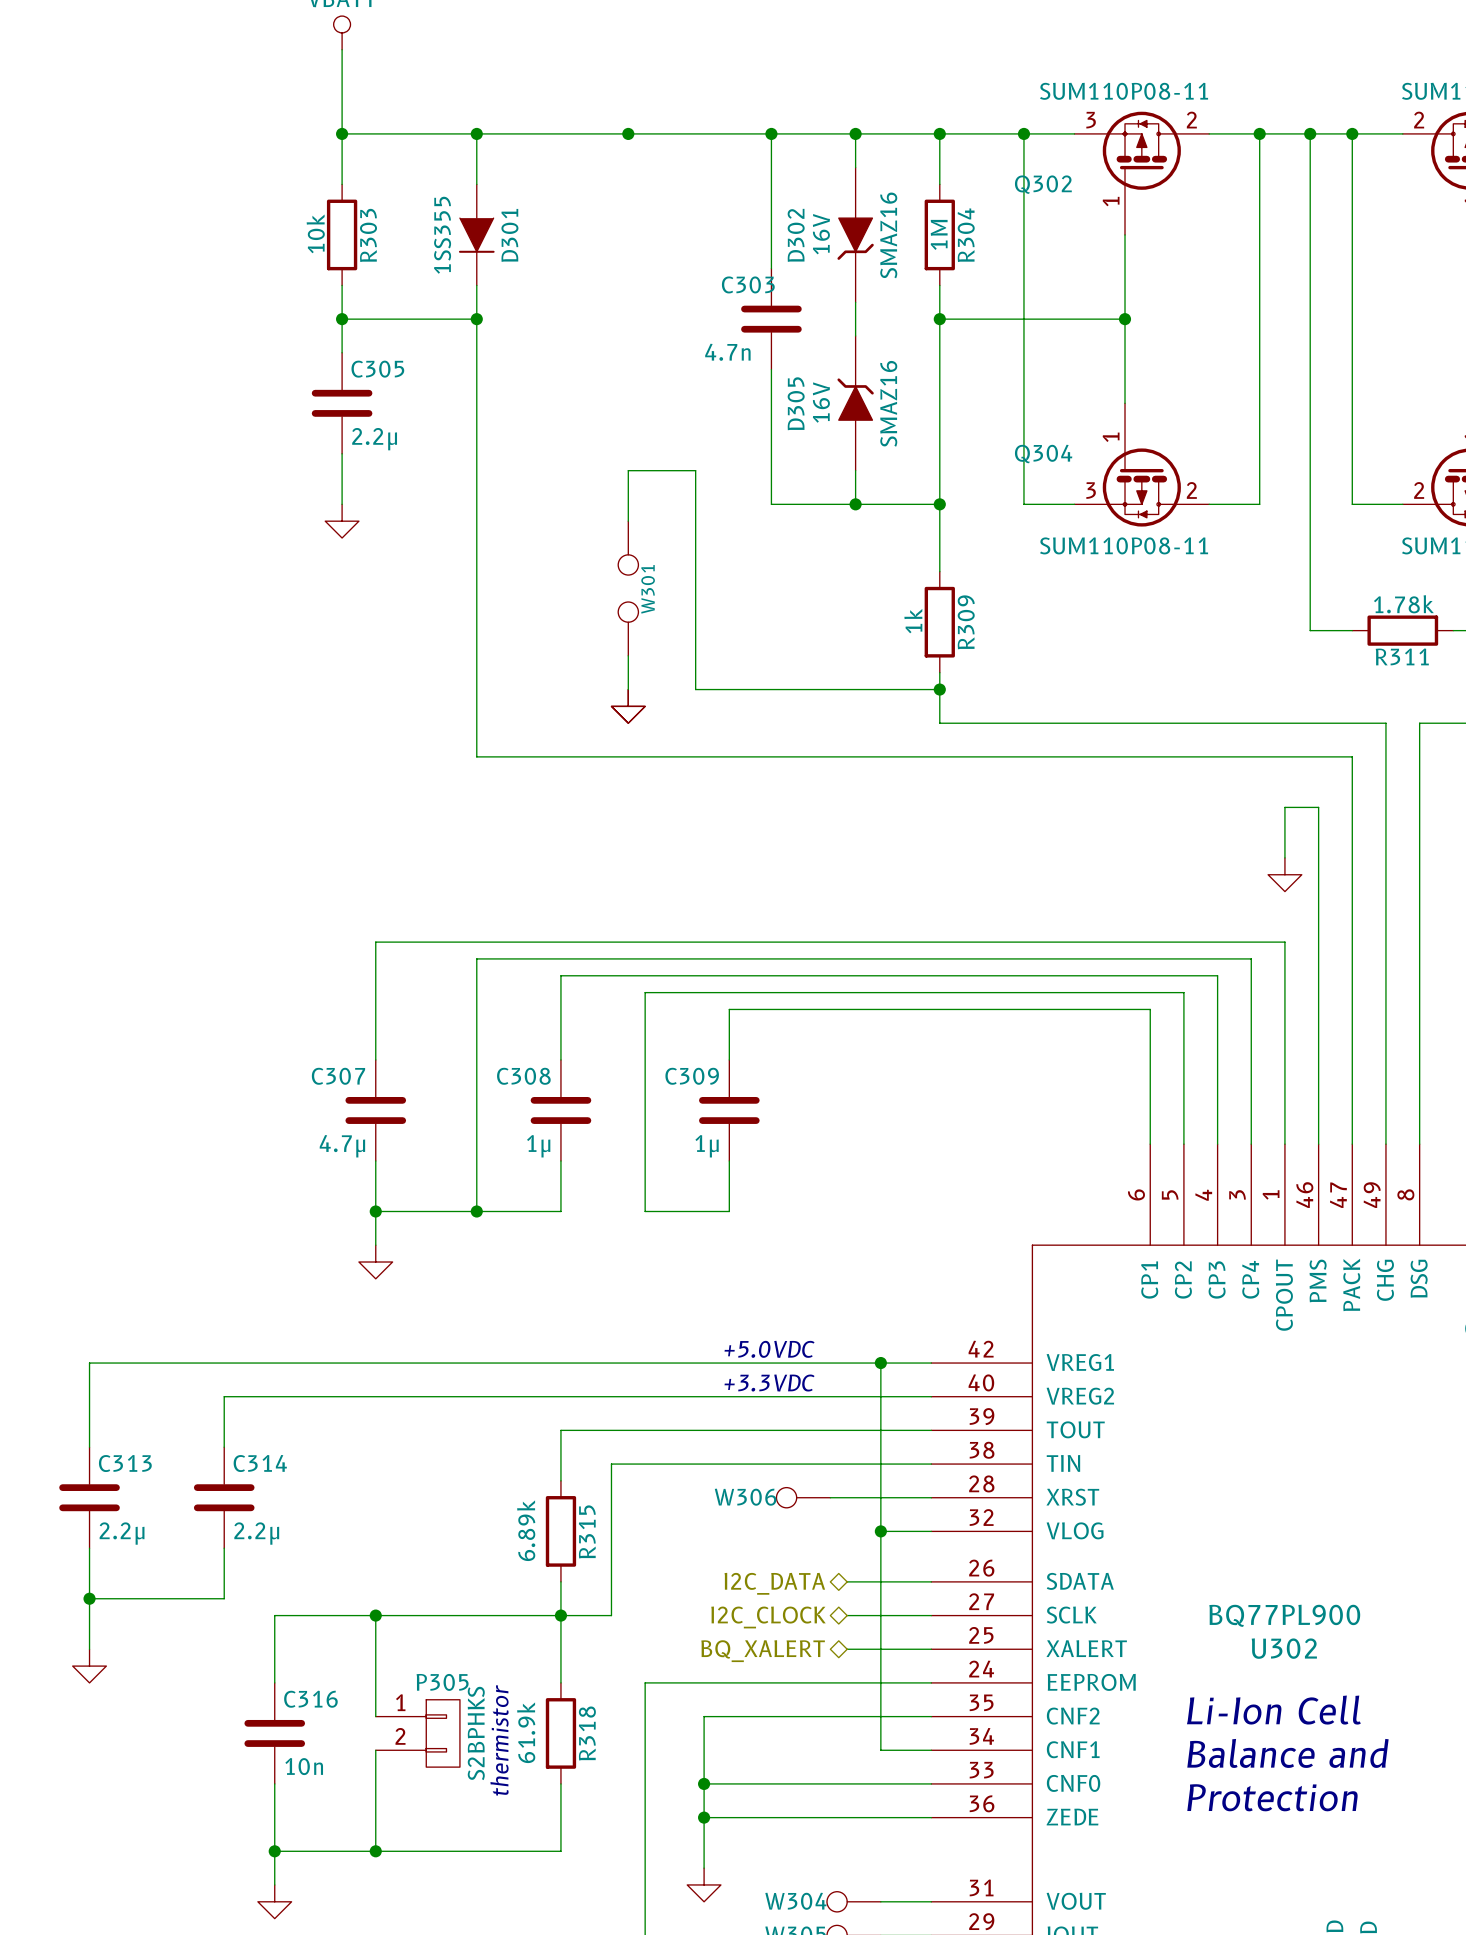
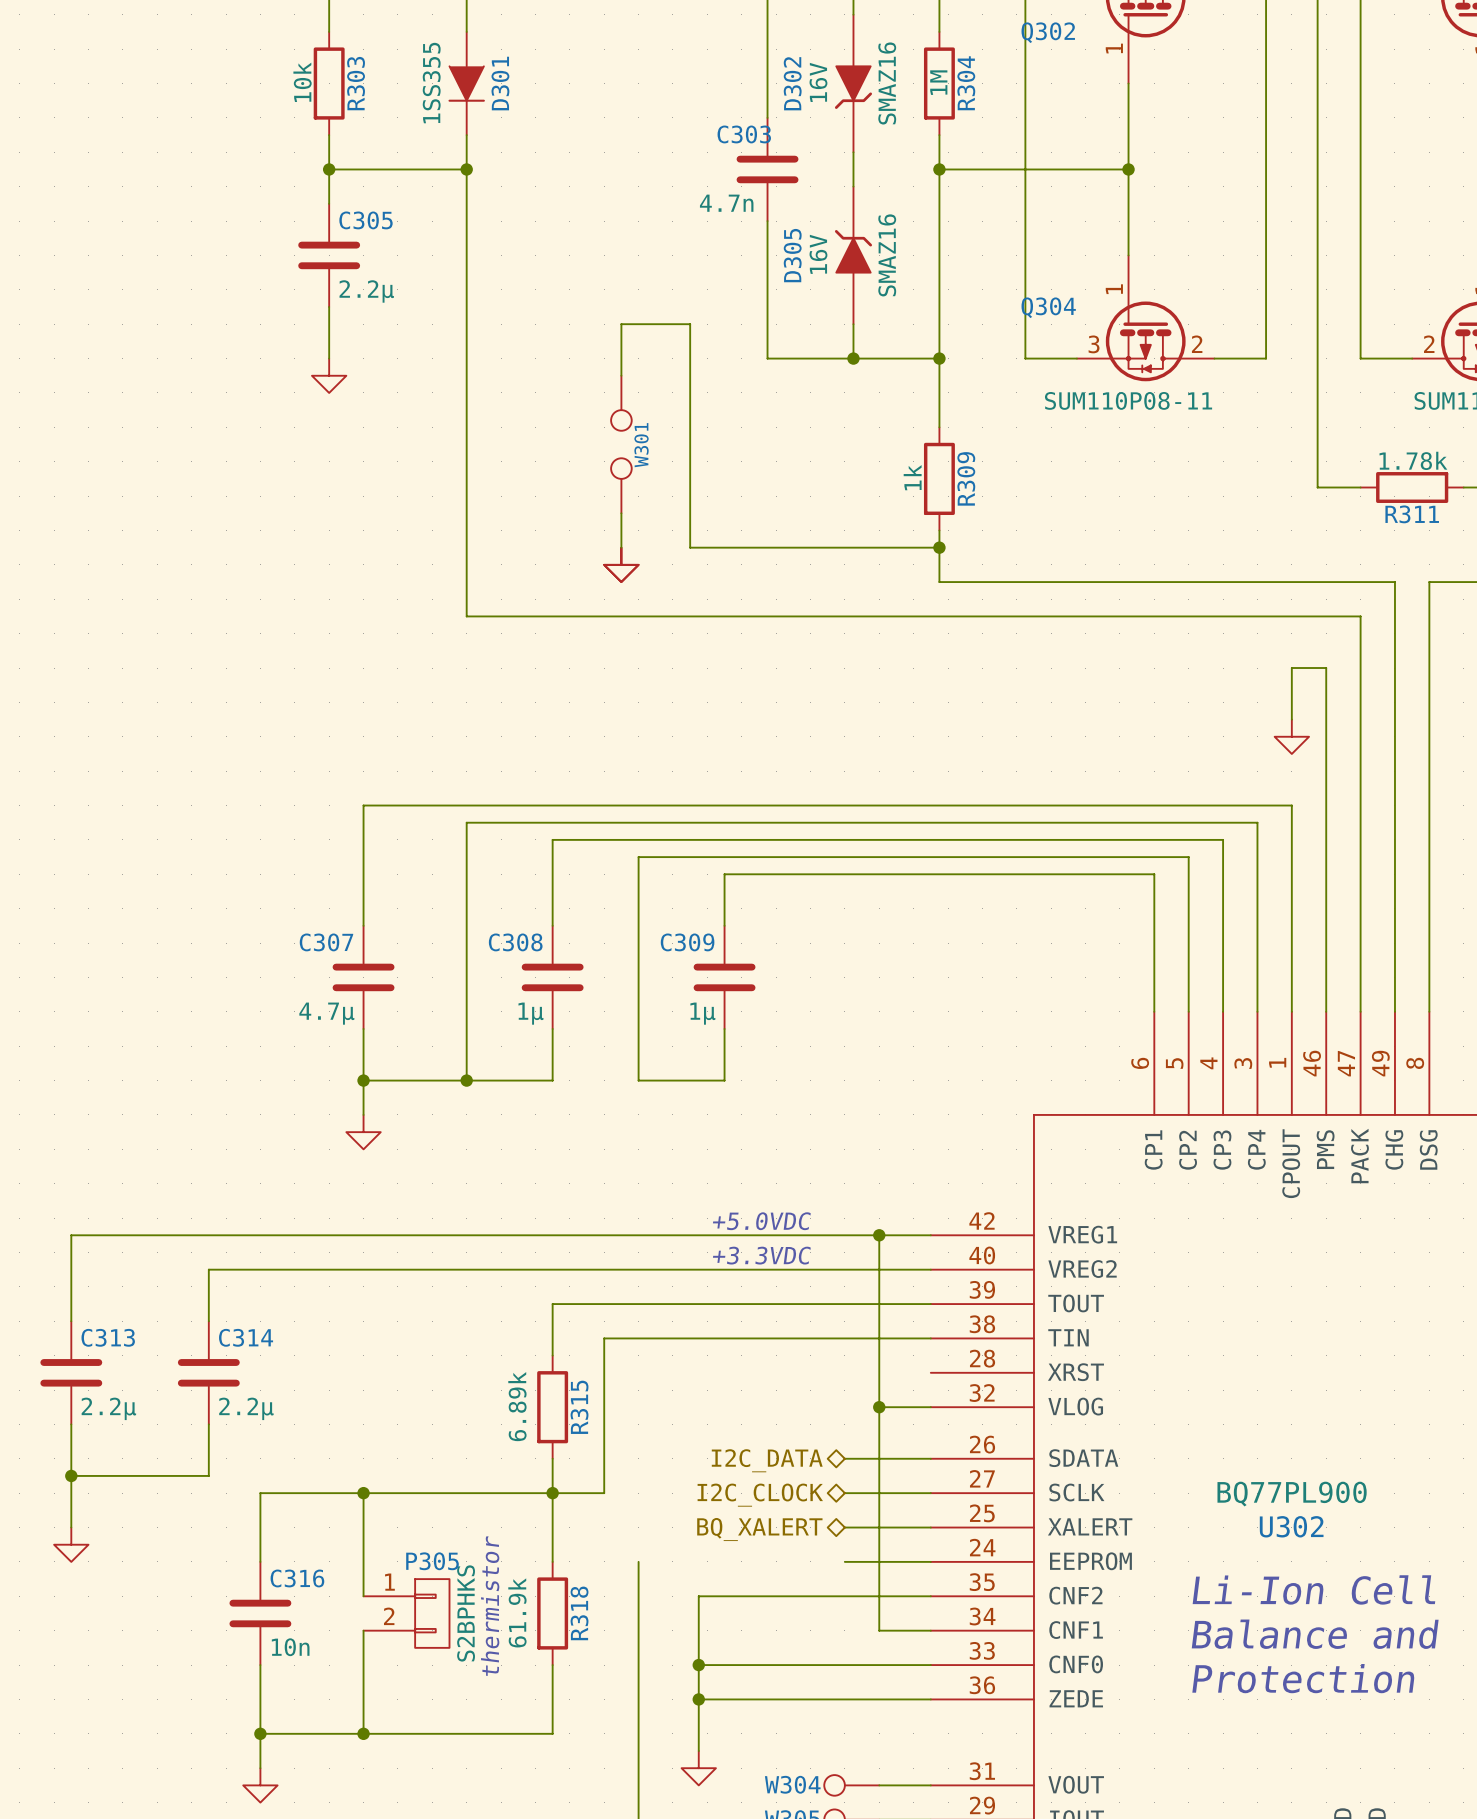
W306: (803, 1497) -> none
wire: (830, 1497) (931, 1497) -> none
wire: (645, 1682) (847, 1682) -> none

